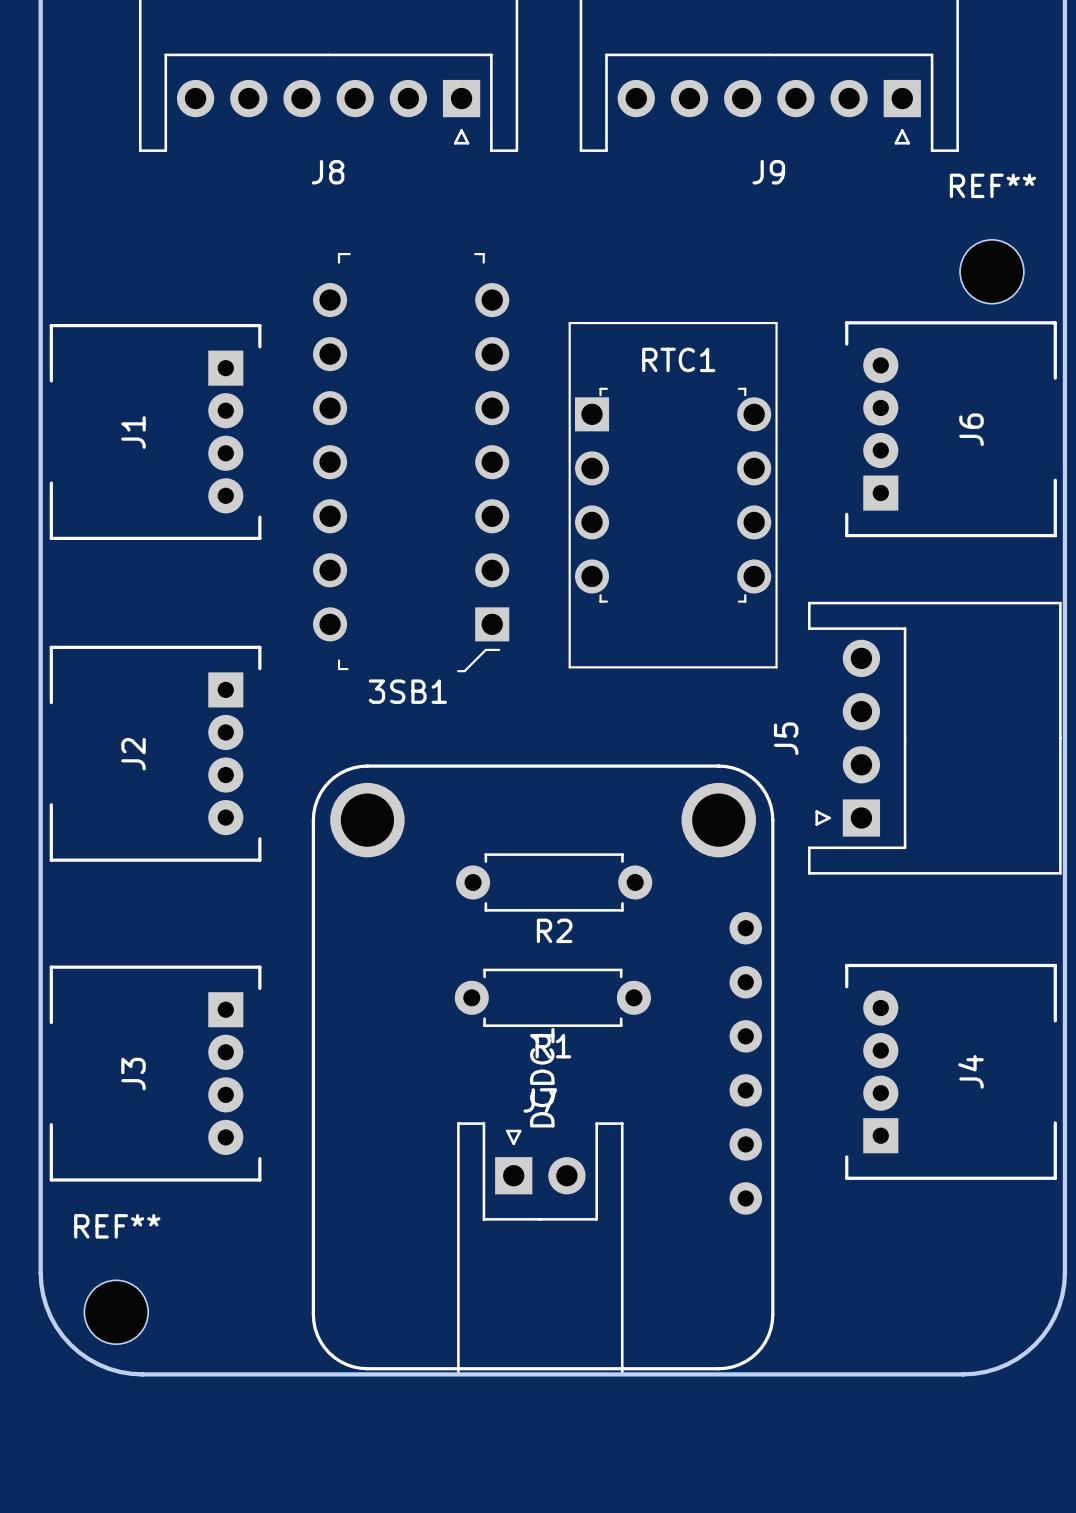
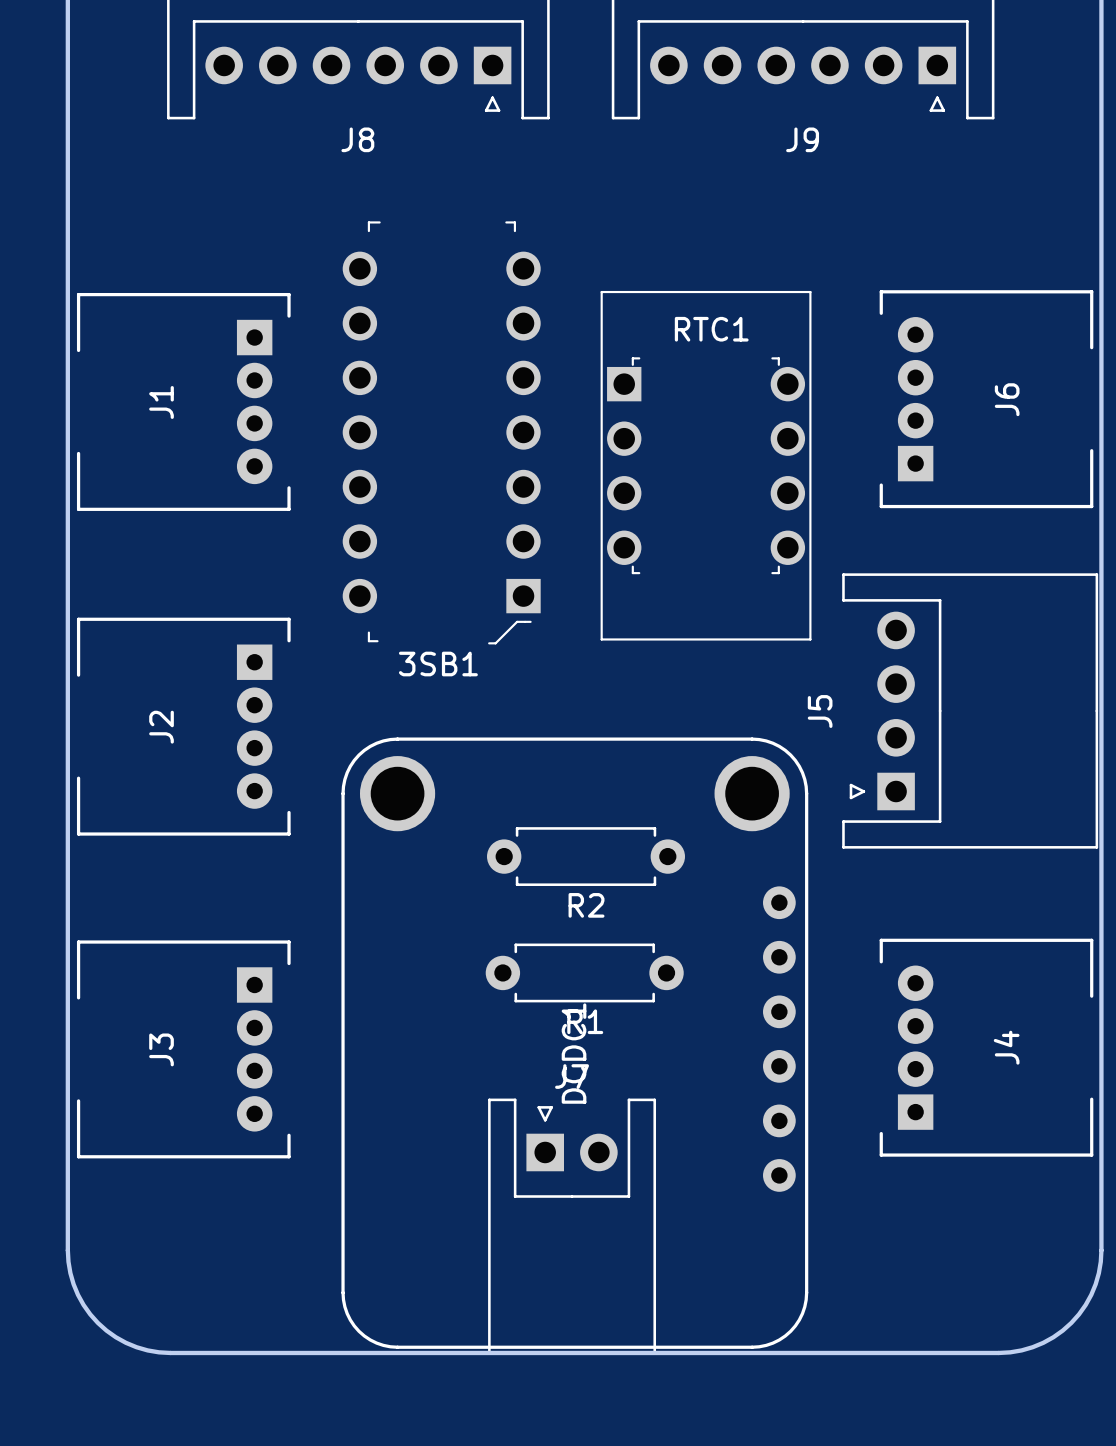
REF**: (991, 271) -> none
REF**: (116, 1312) -> none

